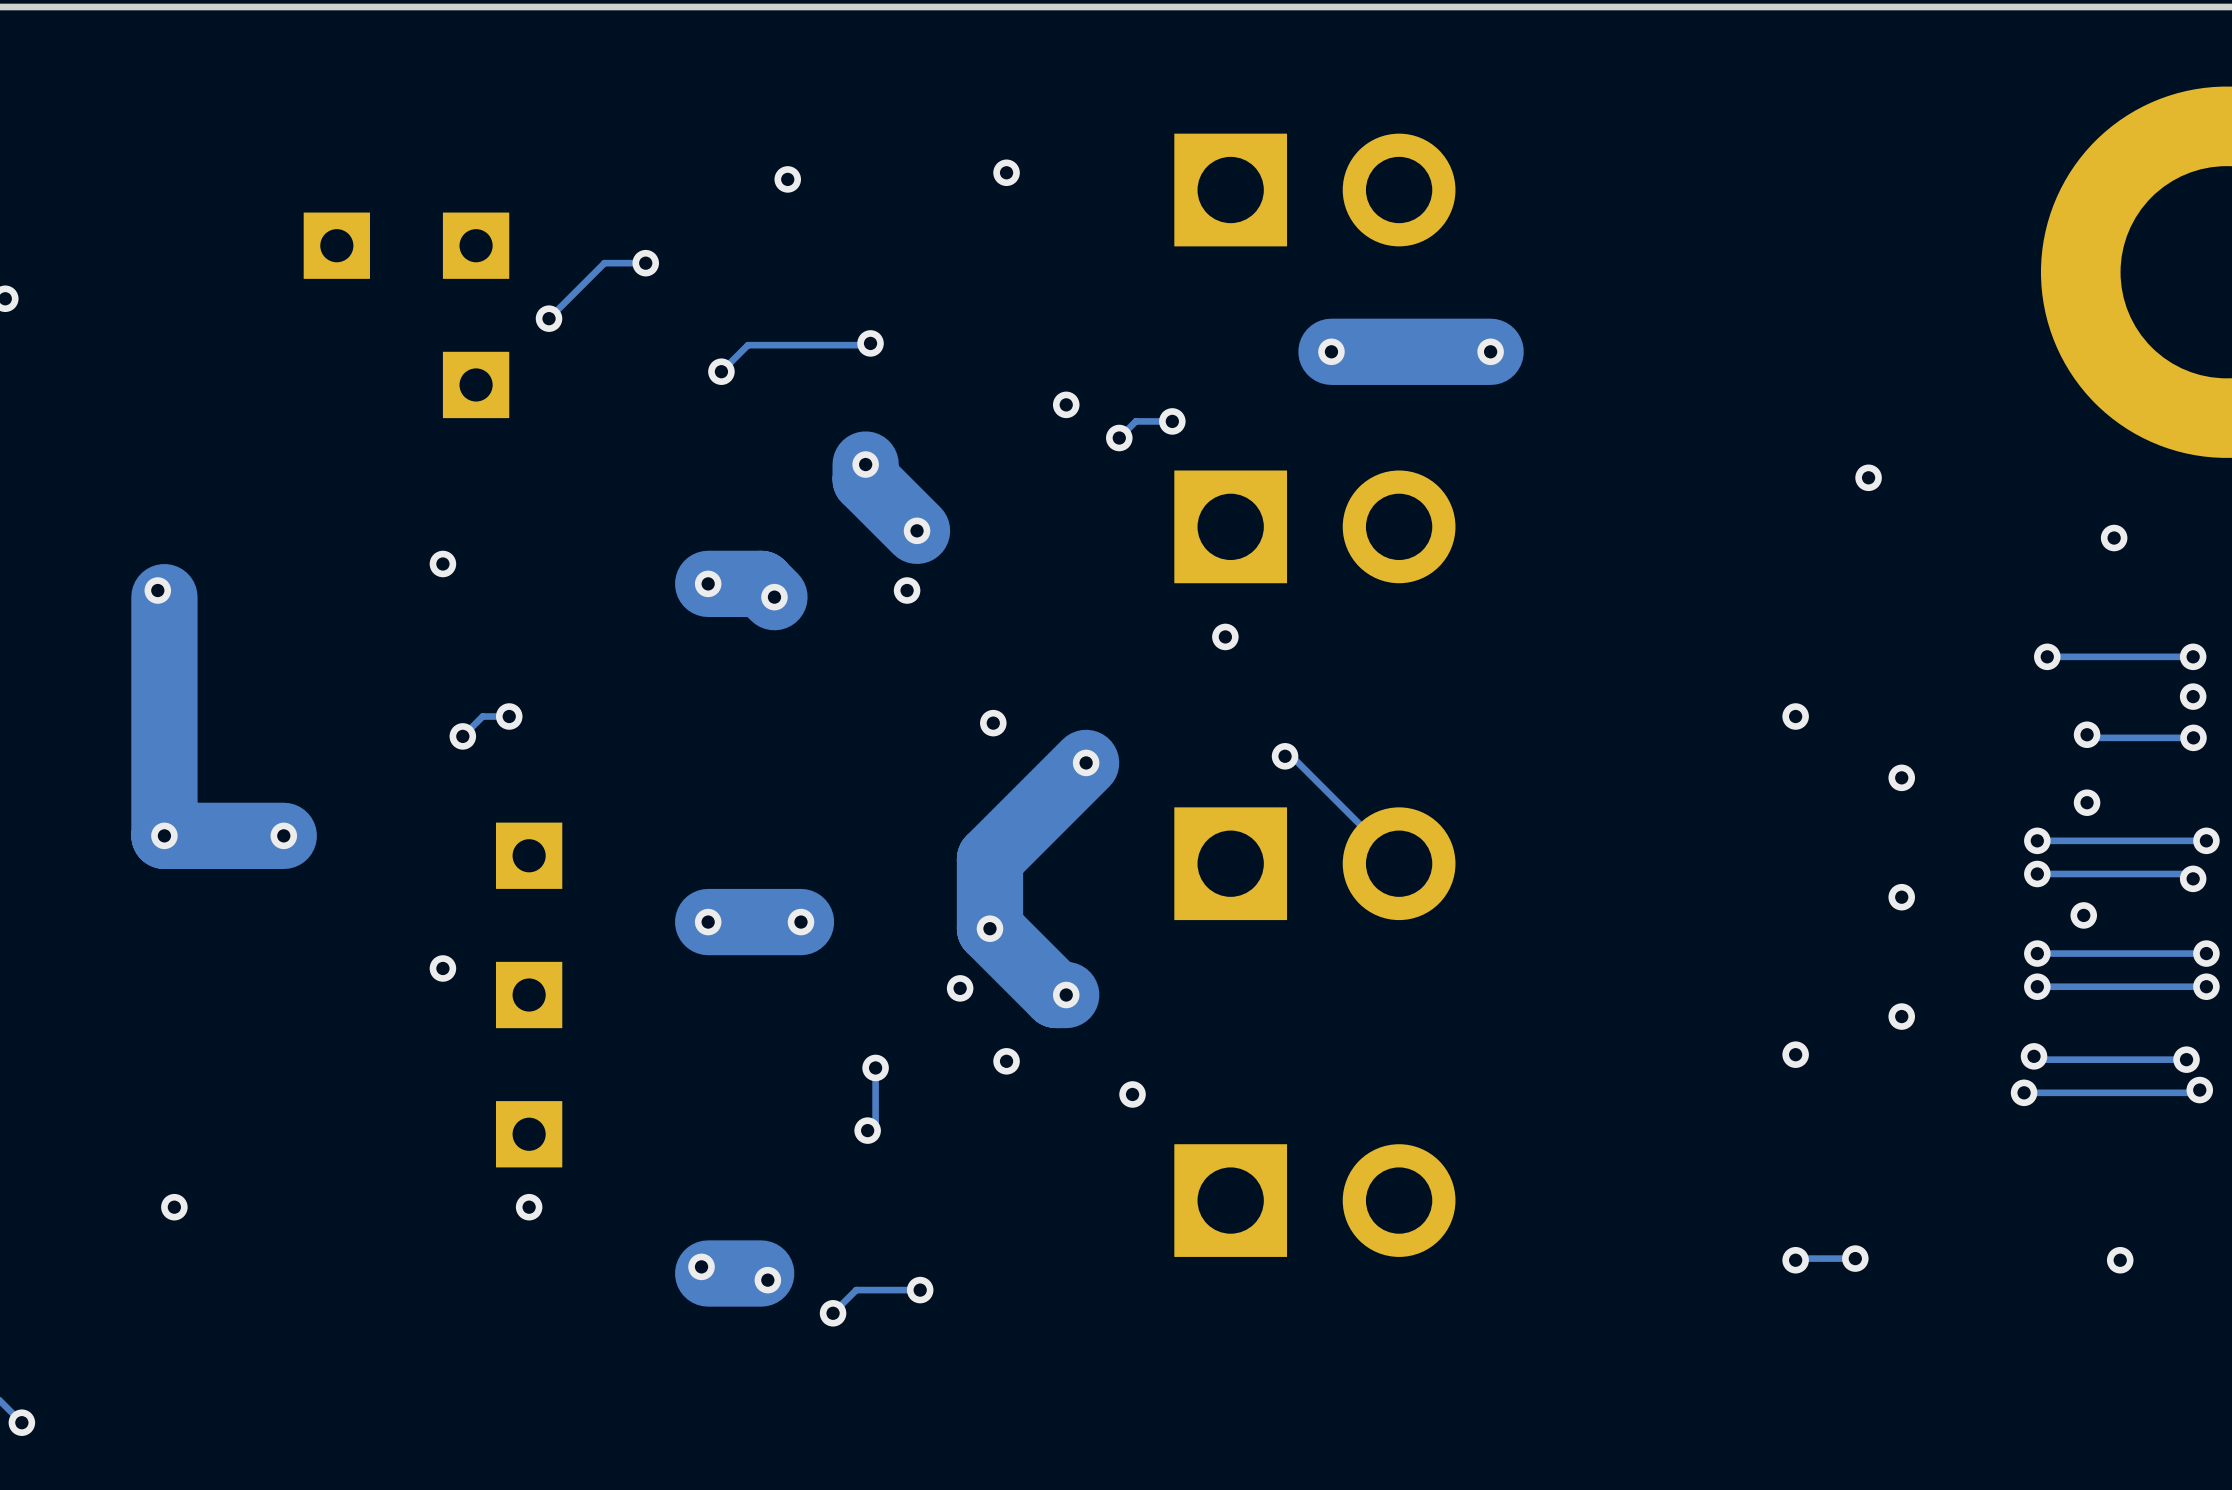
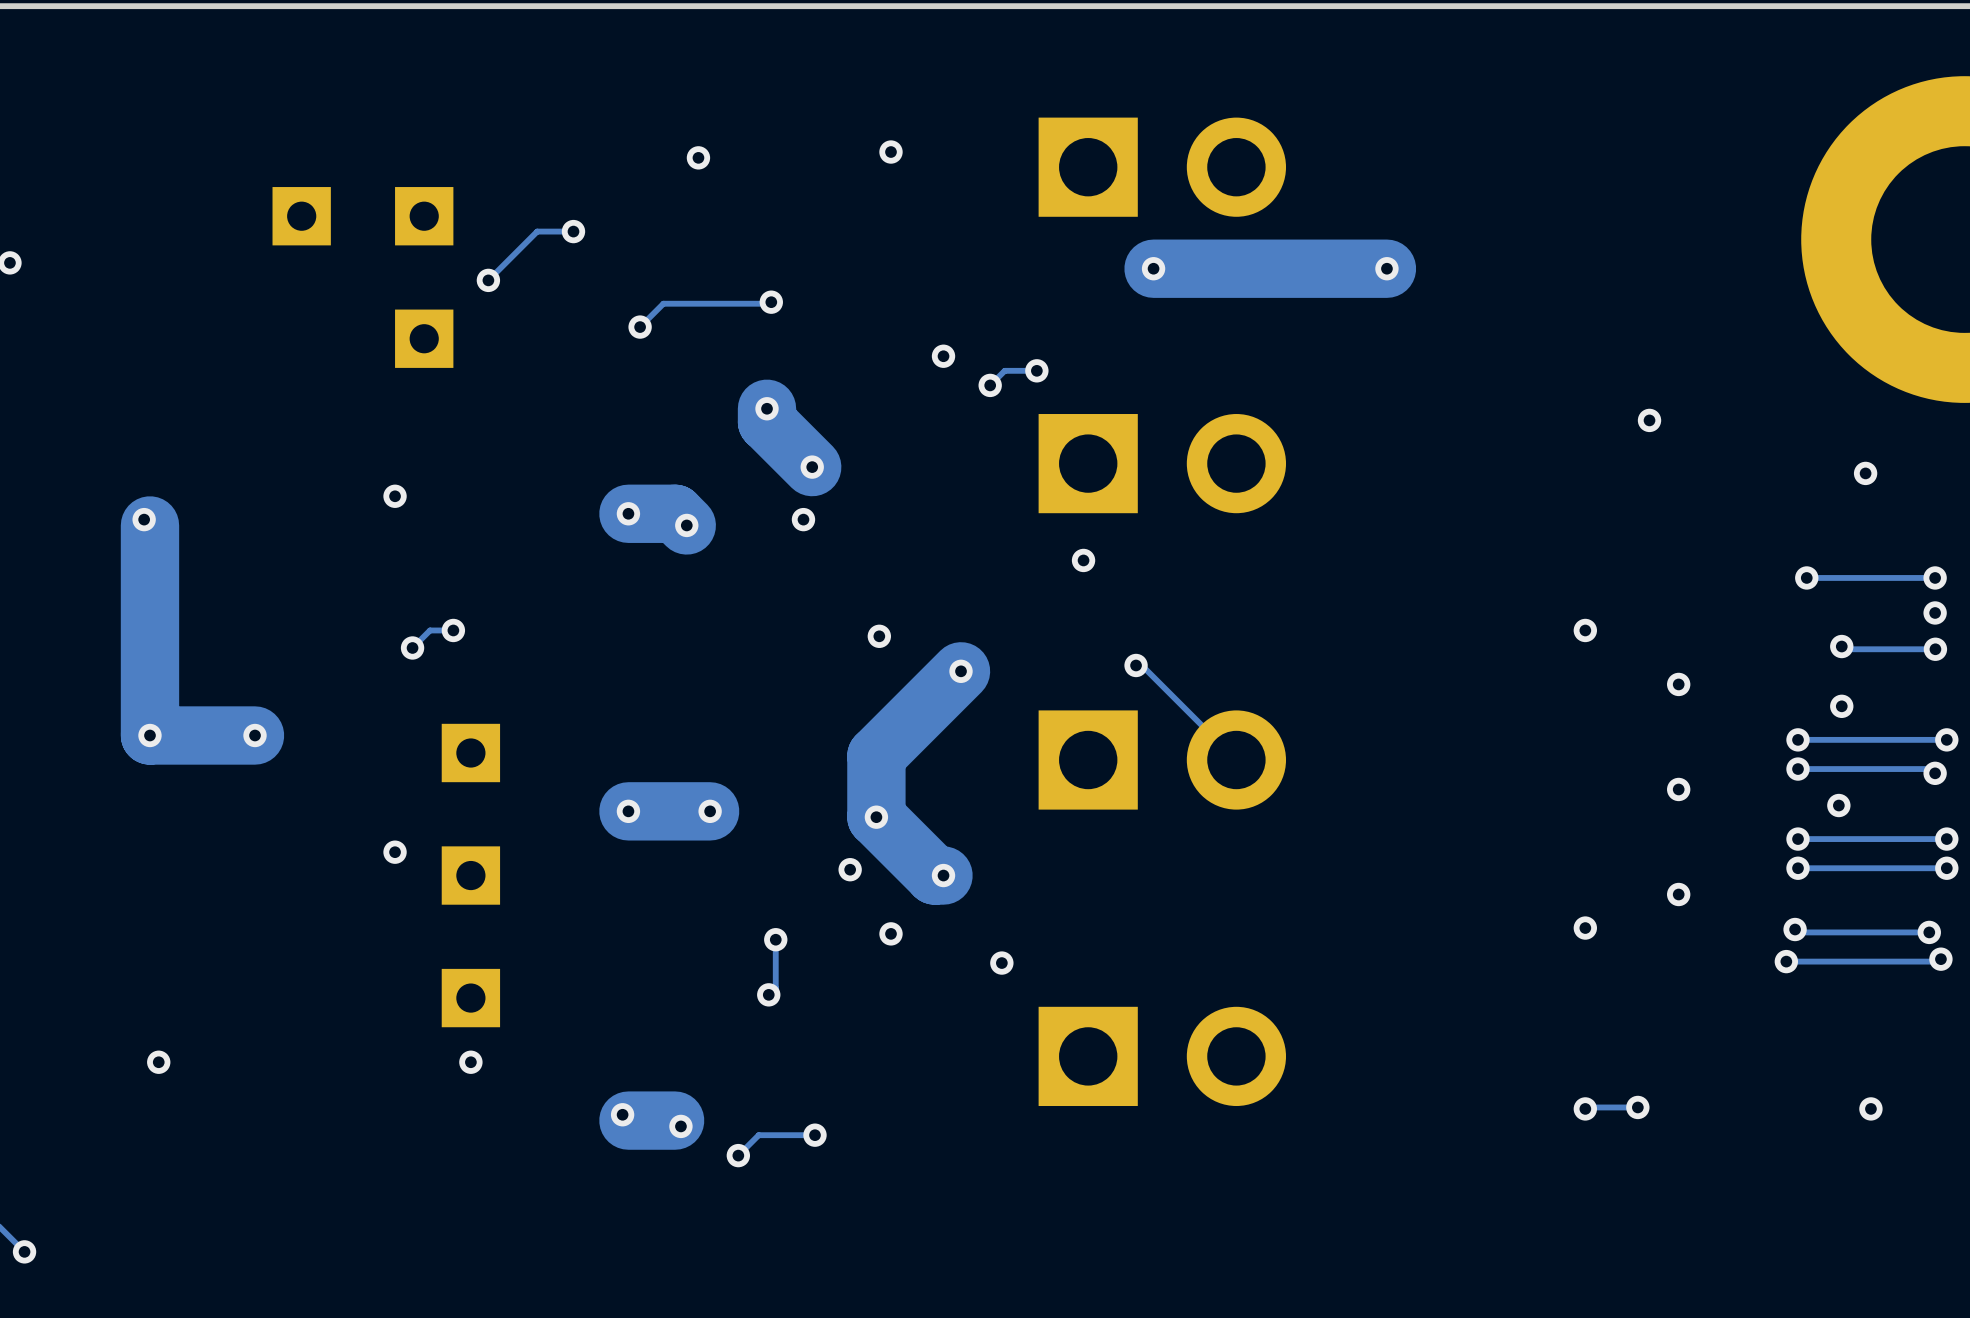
track: none -> (1386, 268) (1153, 268)
via position: (1331, 351) -> (1153, 268)
track: (1490, 351) (1331, 351) -> none
via position: (1490, 351) -> (1386, 268)

